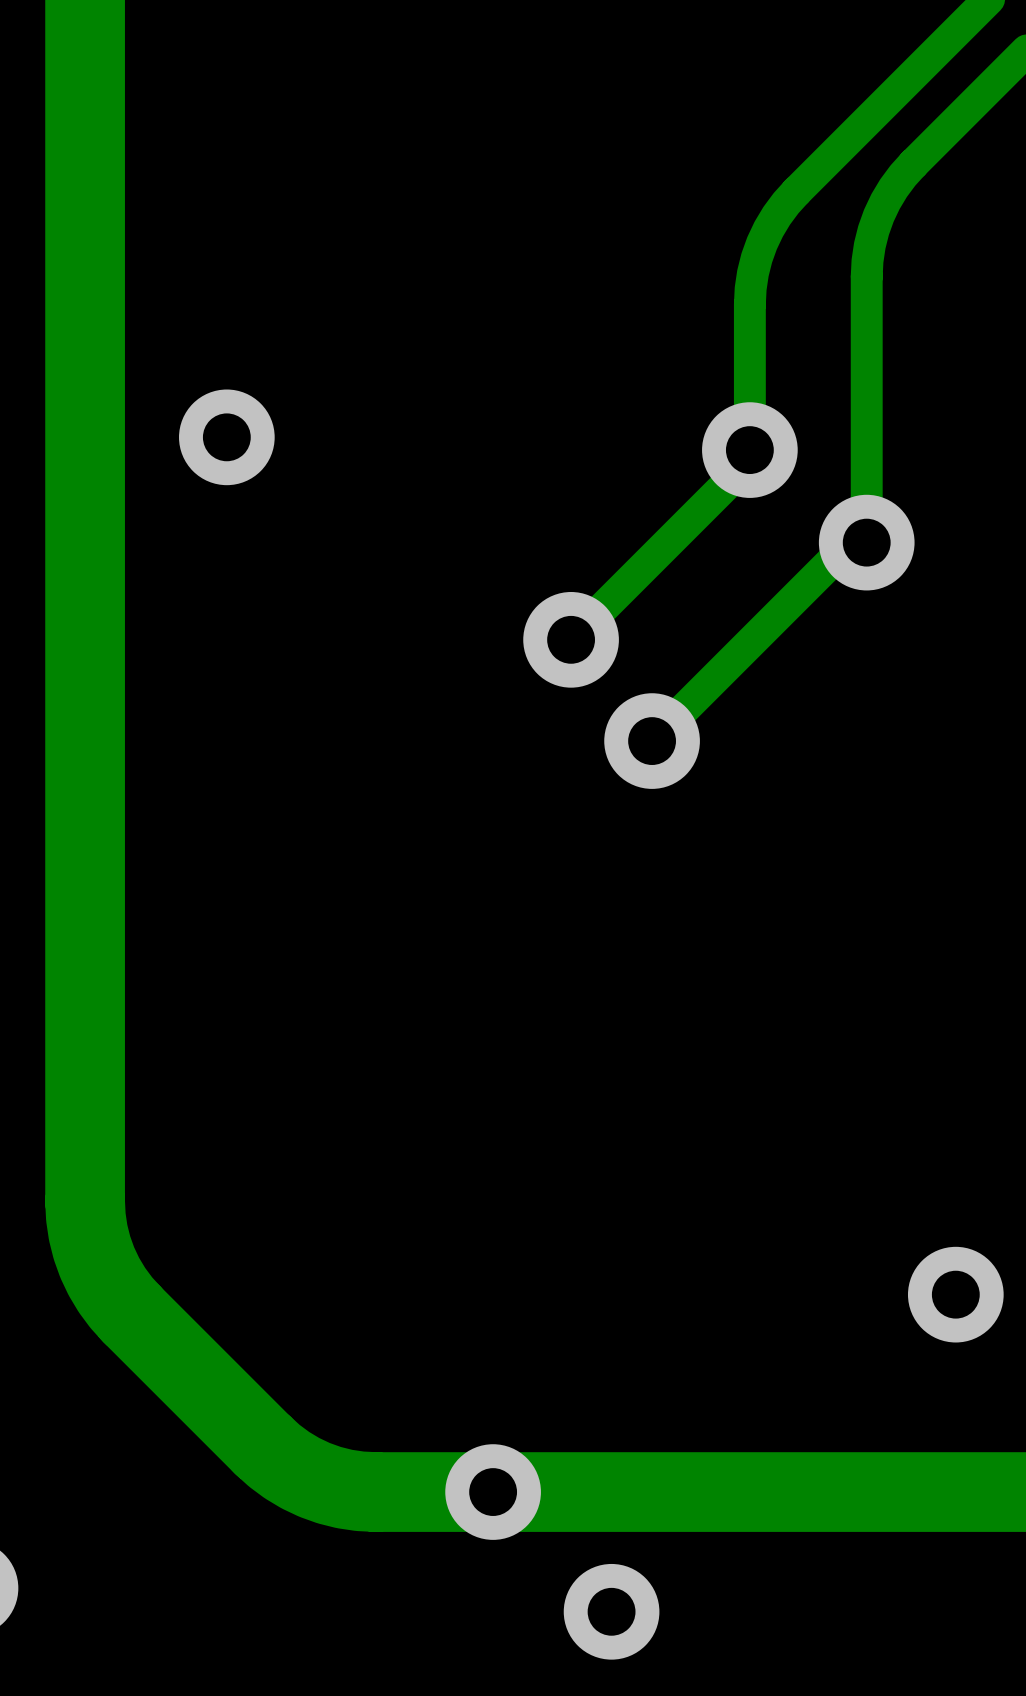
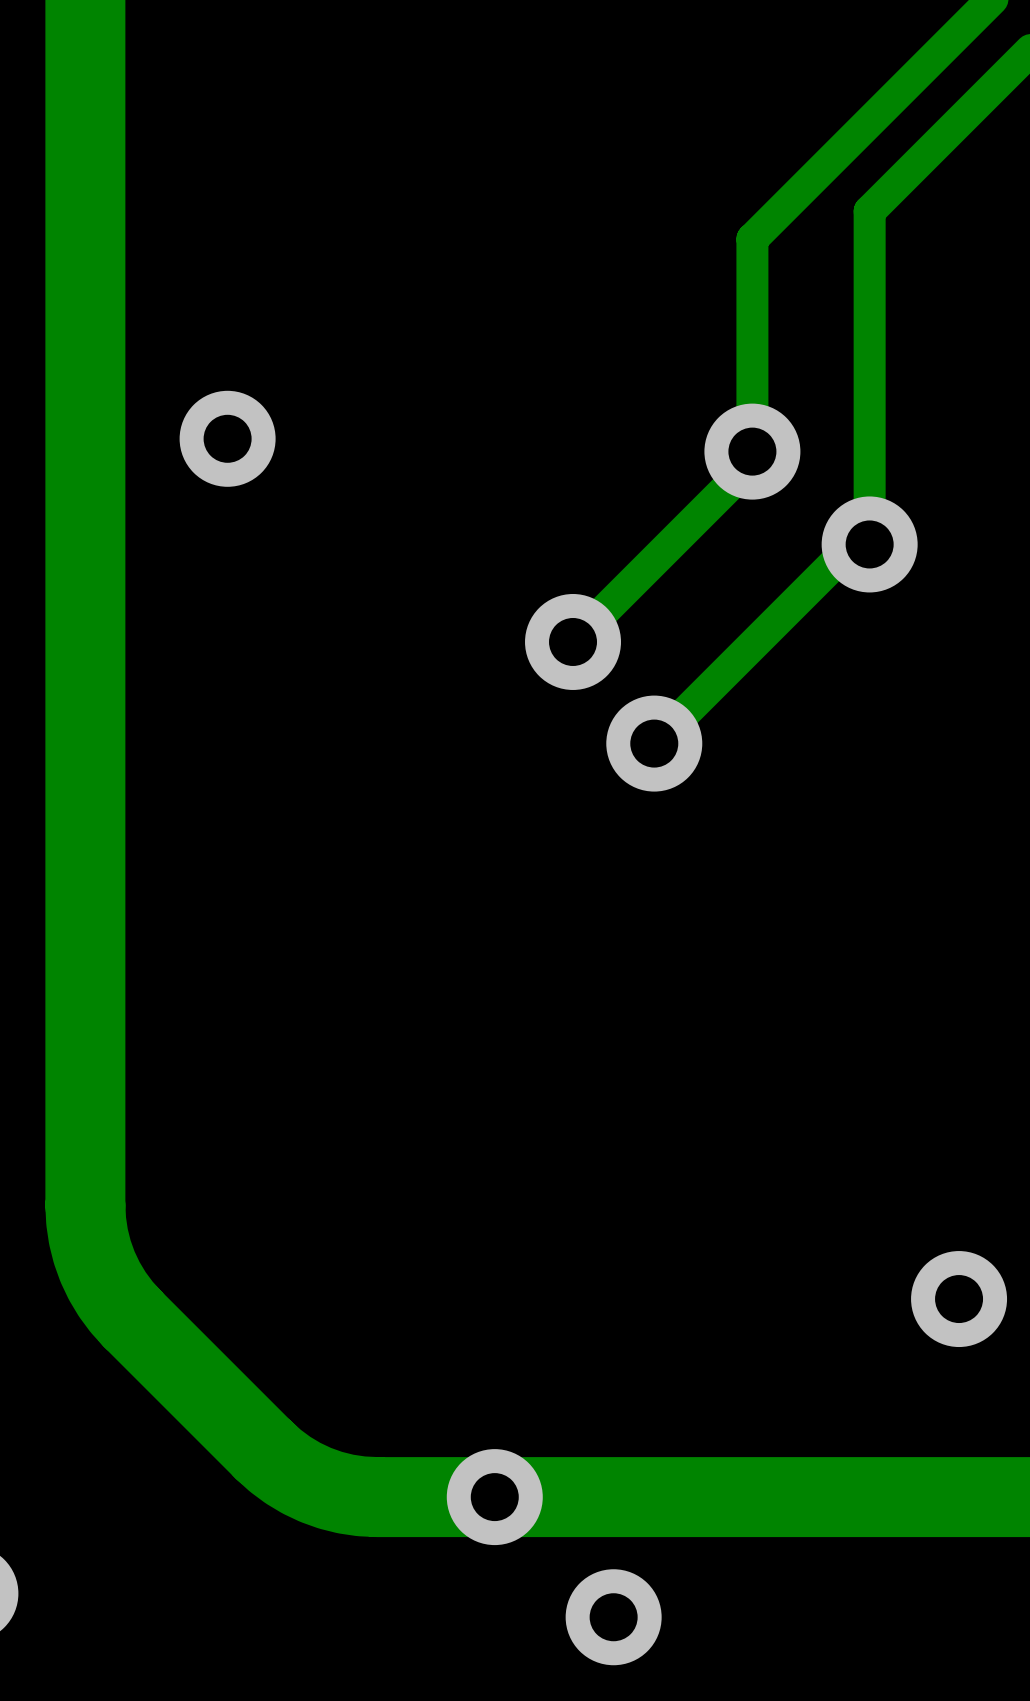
track: (913, 163) (893, 188) (878, 215) (869, 245) (866, 276) -> (916, 164) (869, 211) (869, 277)
track: (796, 191) (776, 215) (762, 243) (752, 273) (749, 304) -> (799, 192) (752, 239) (752, 305)

